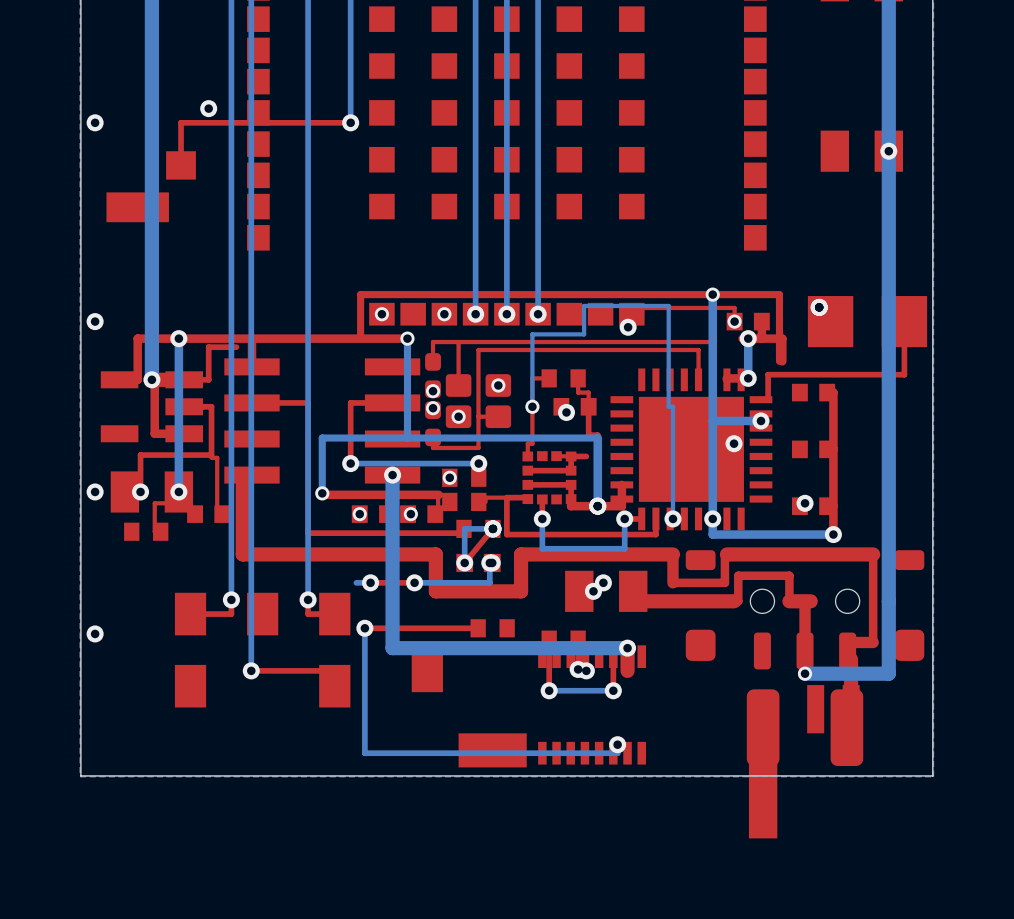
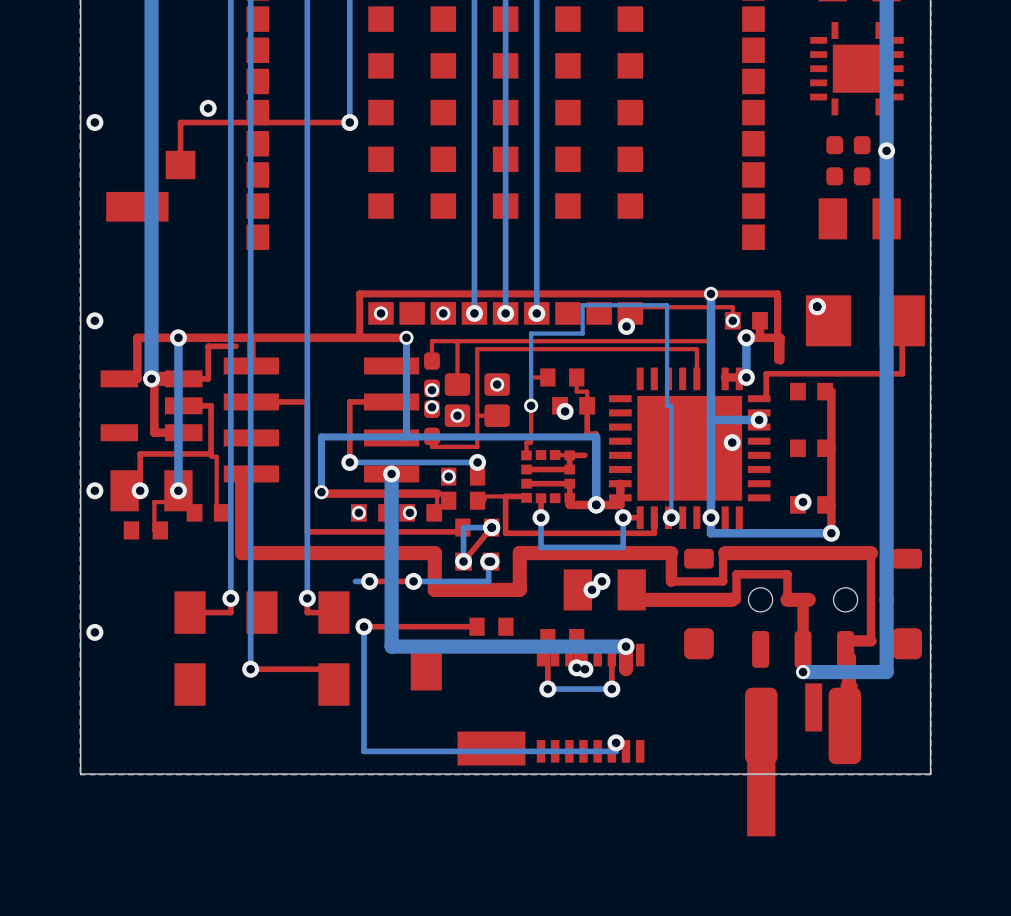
part: none -> (856, 68)
part footprint: [820, 130, 903, 172] -> [826, 136, 871, 155]
part: none -> (848, 176)
part: none -> (859, 218)

